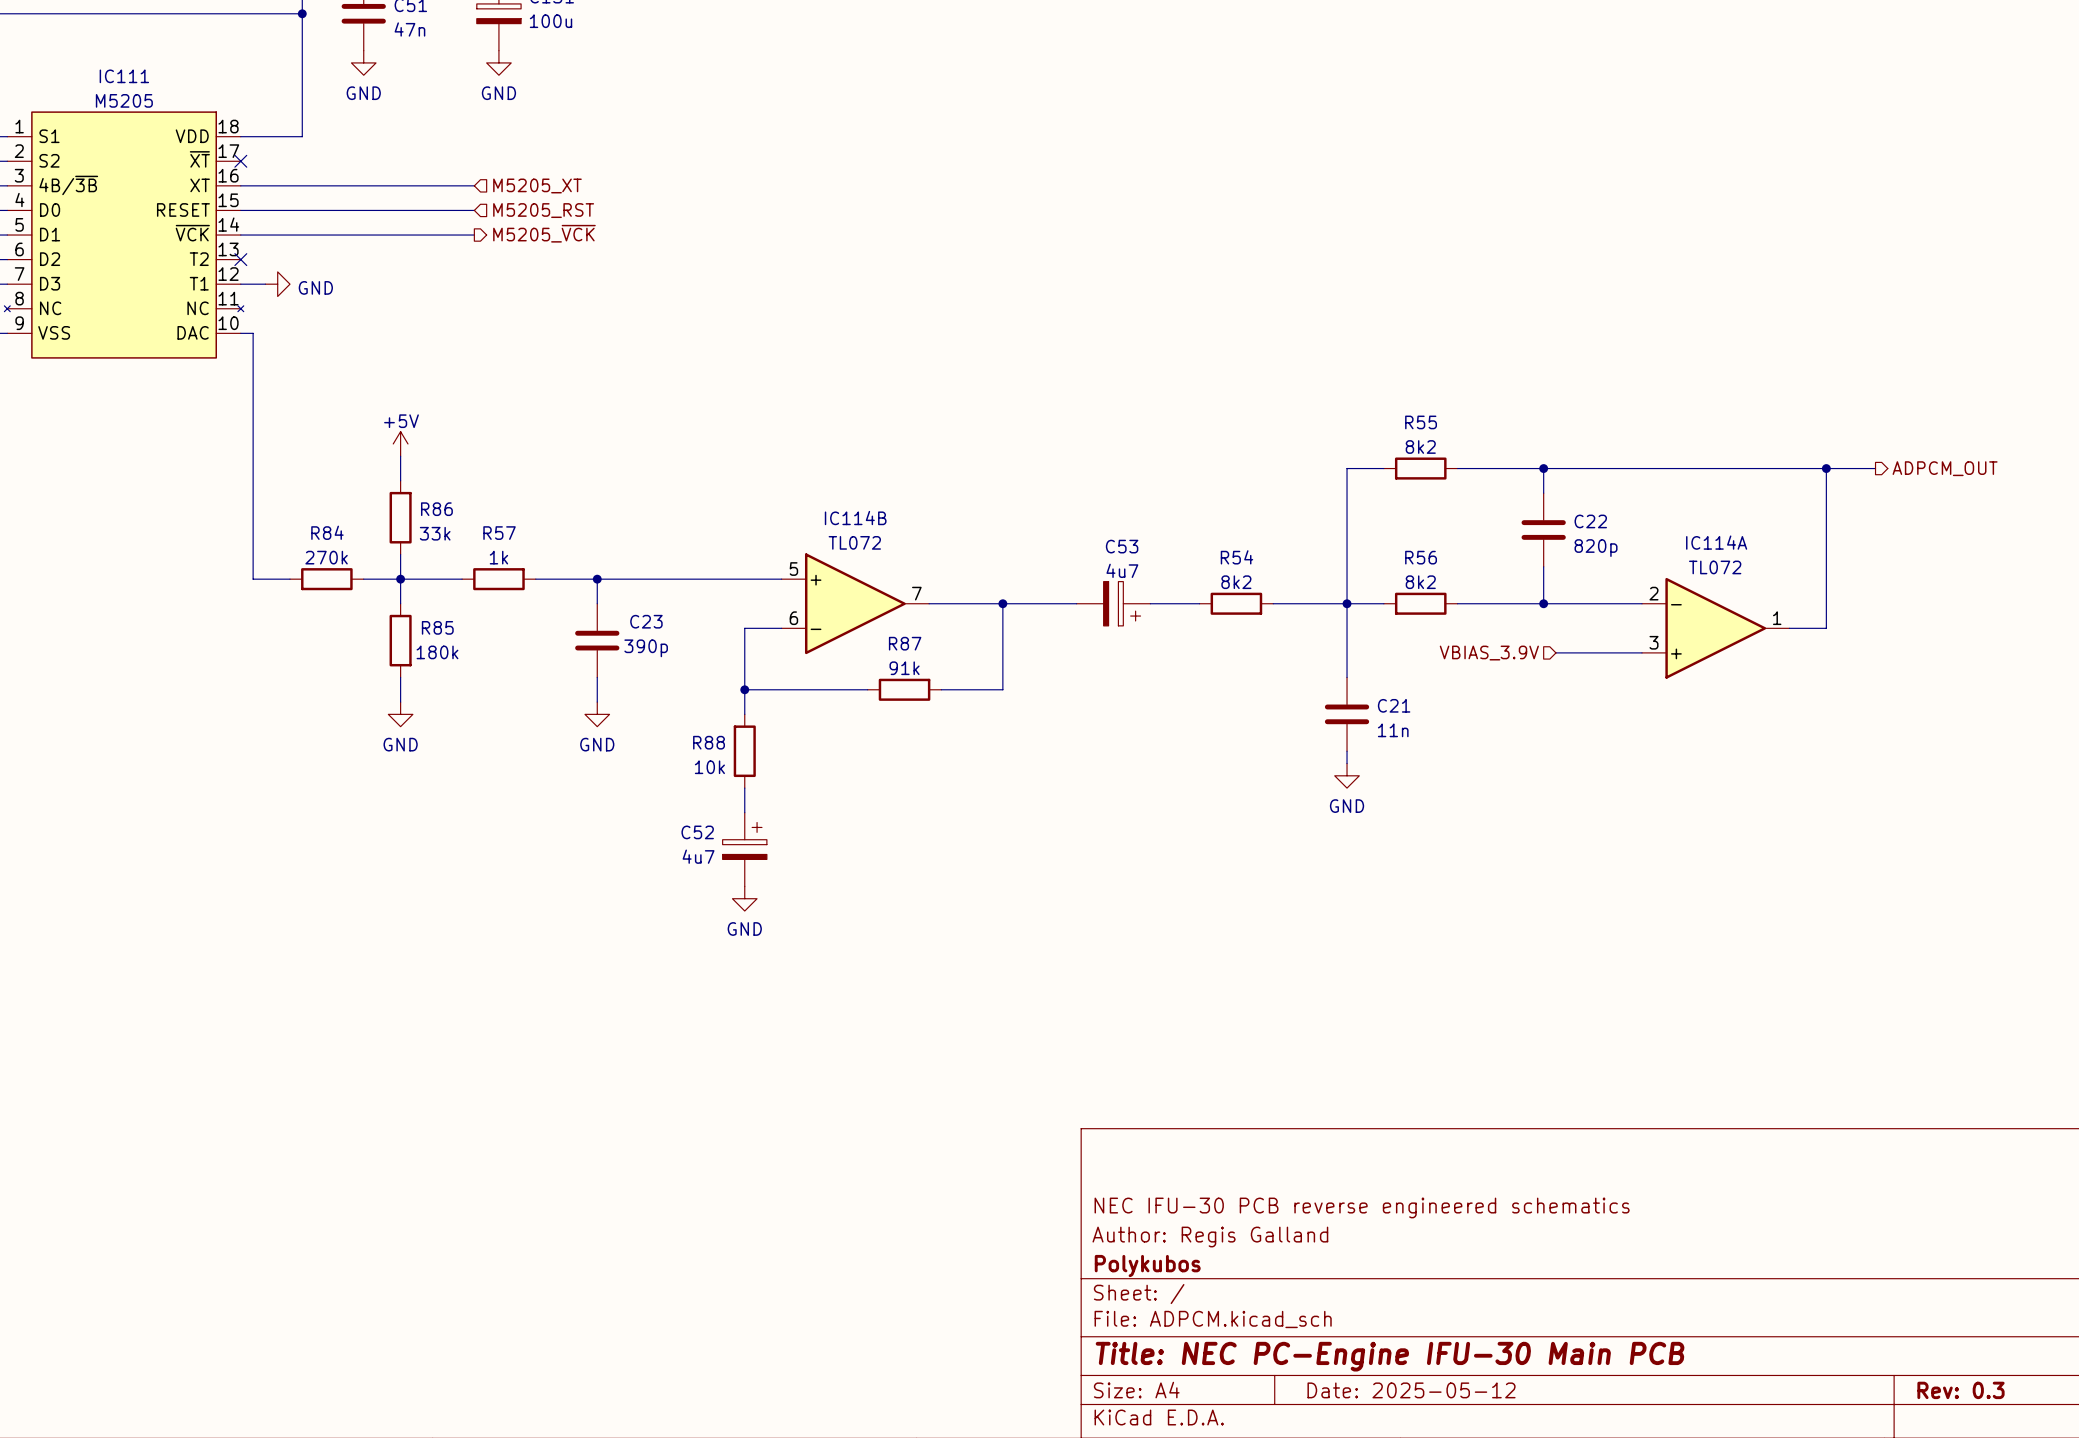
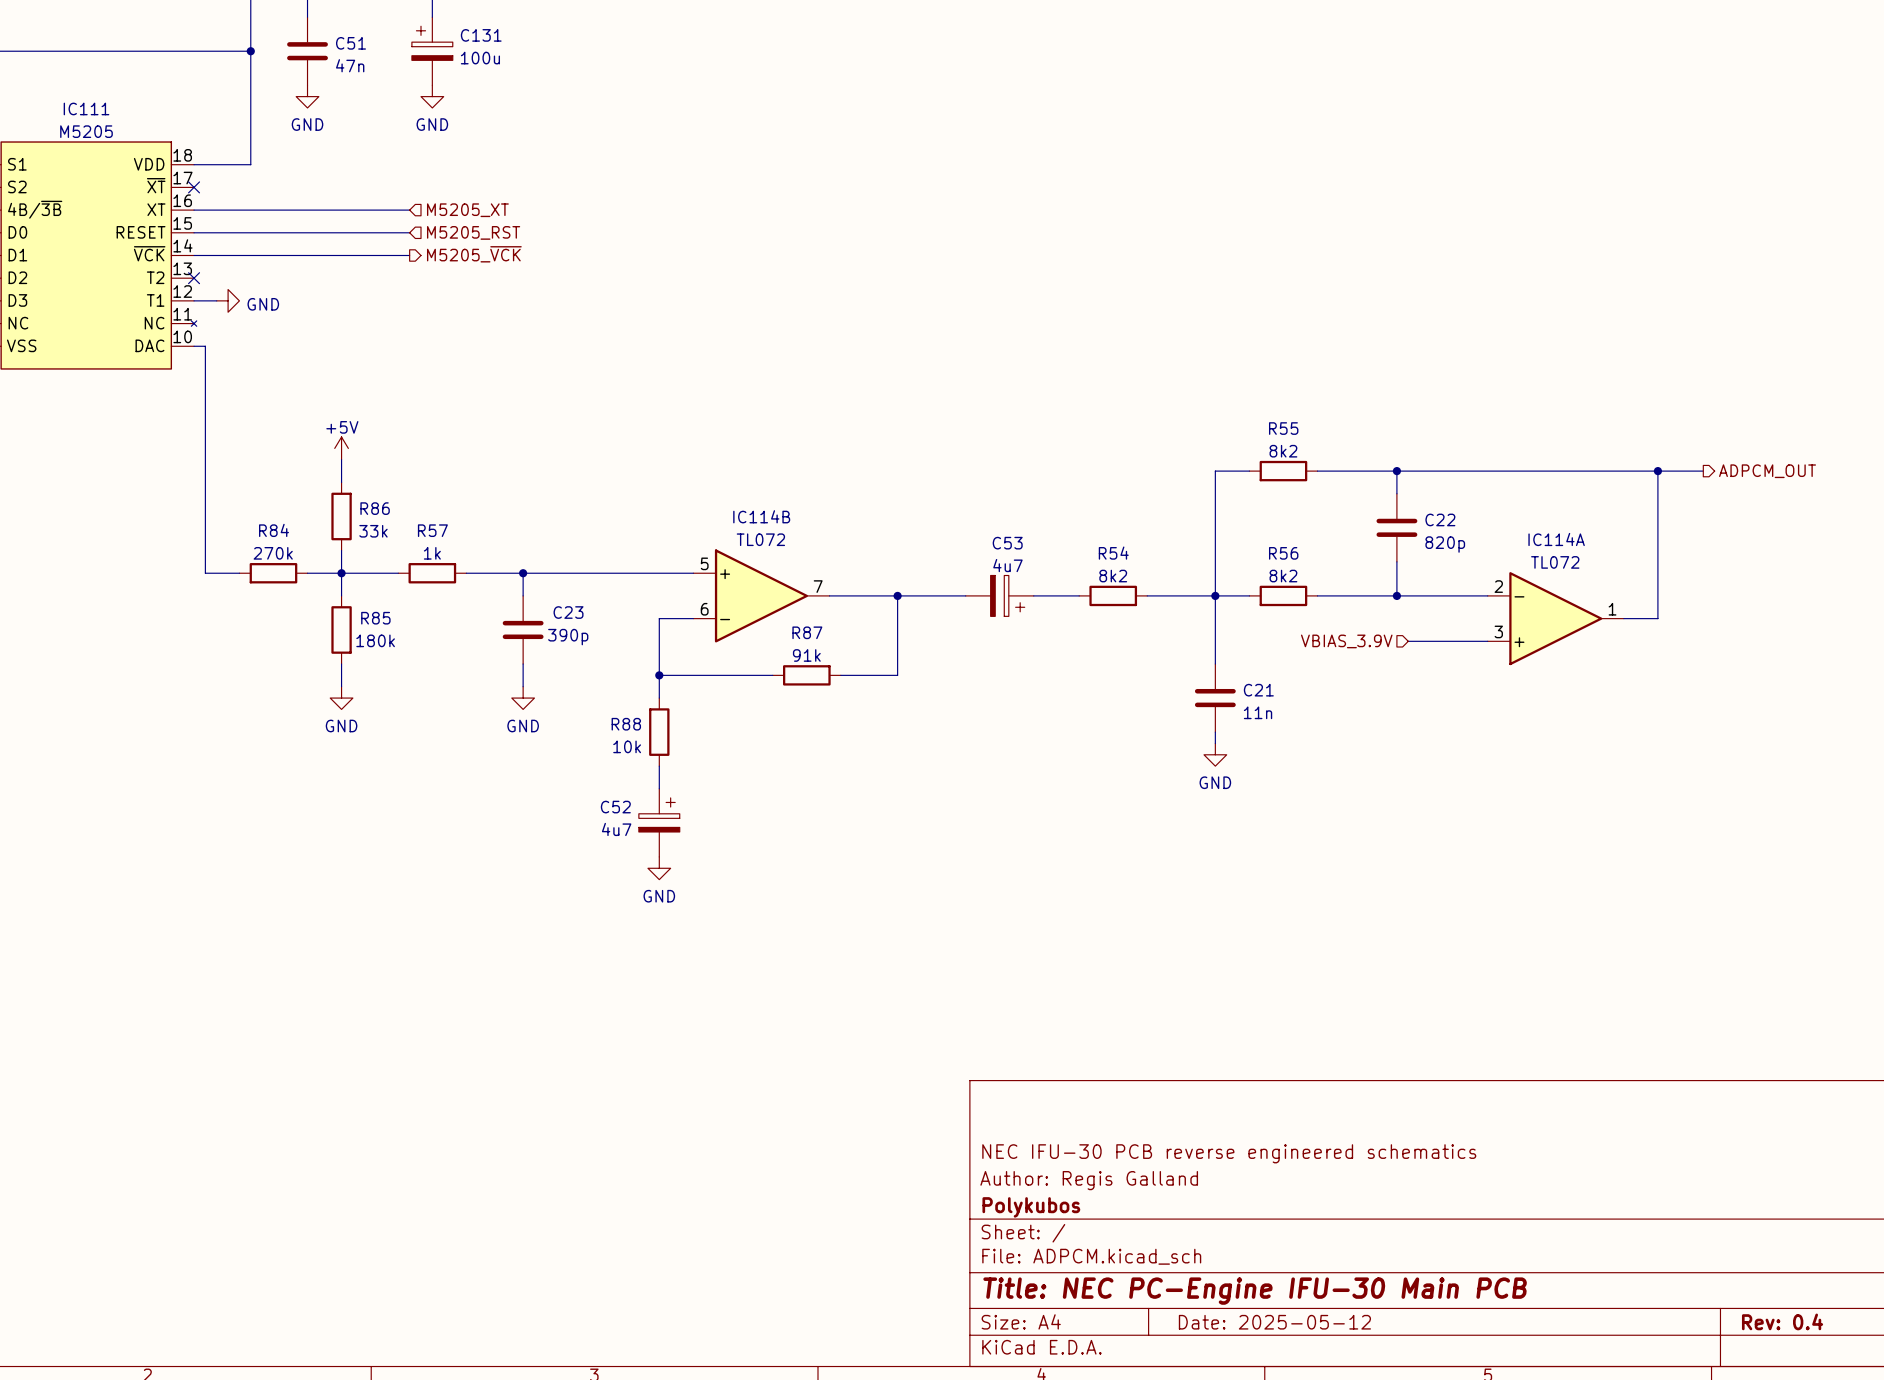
title block: Rev: 0.3 (1961, 1390) -> Rev: 0.4 (1782, 1321)

